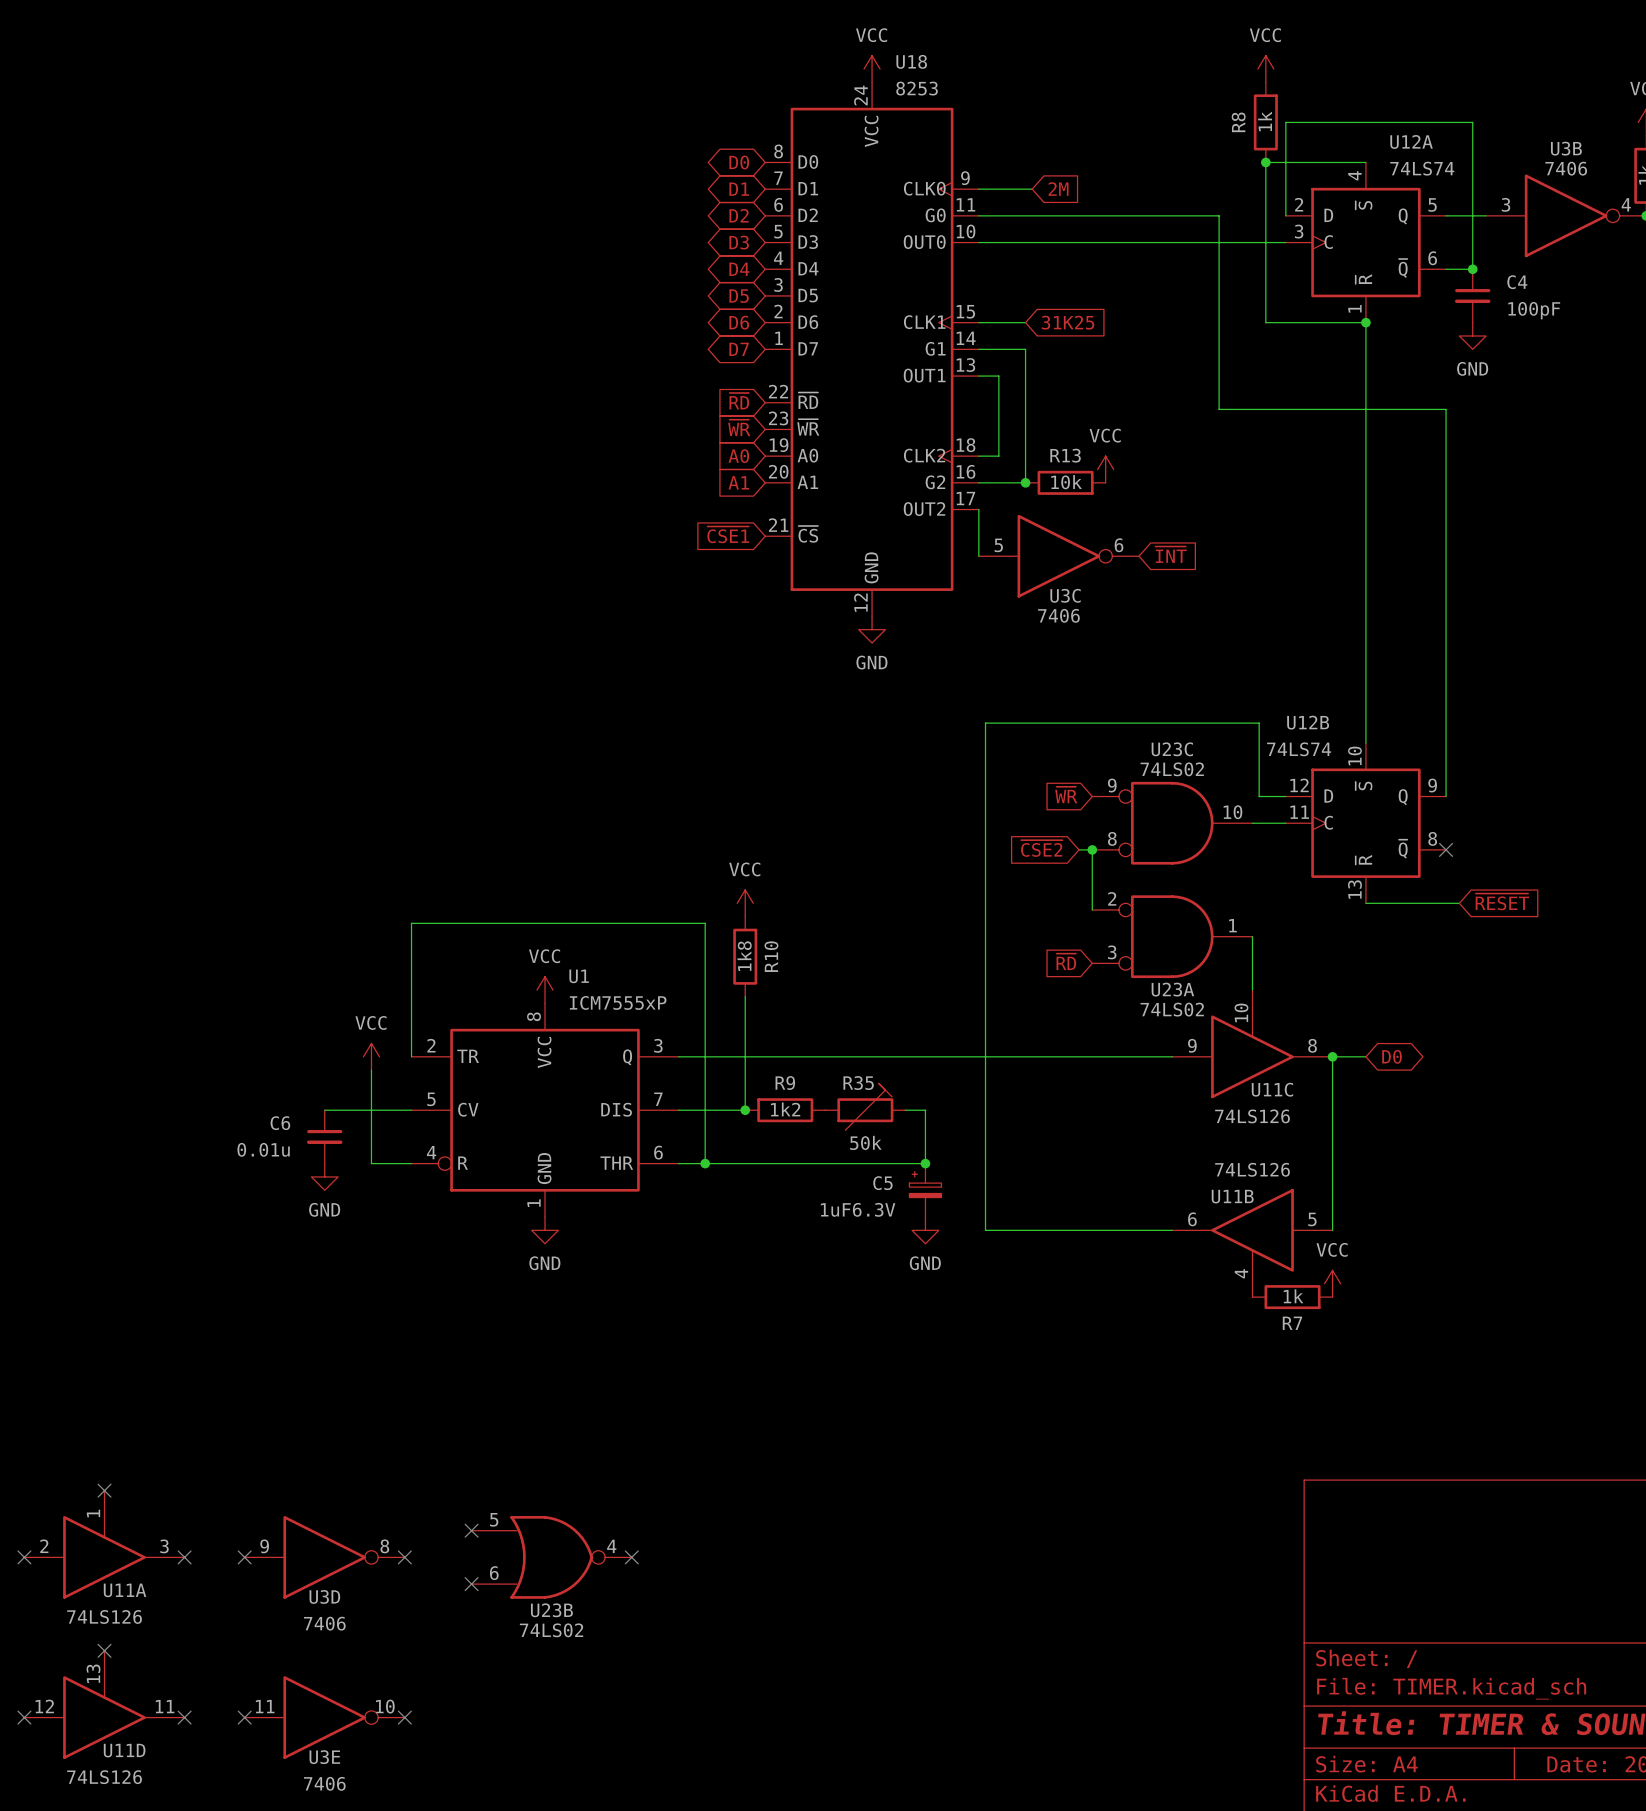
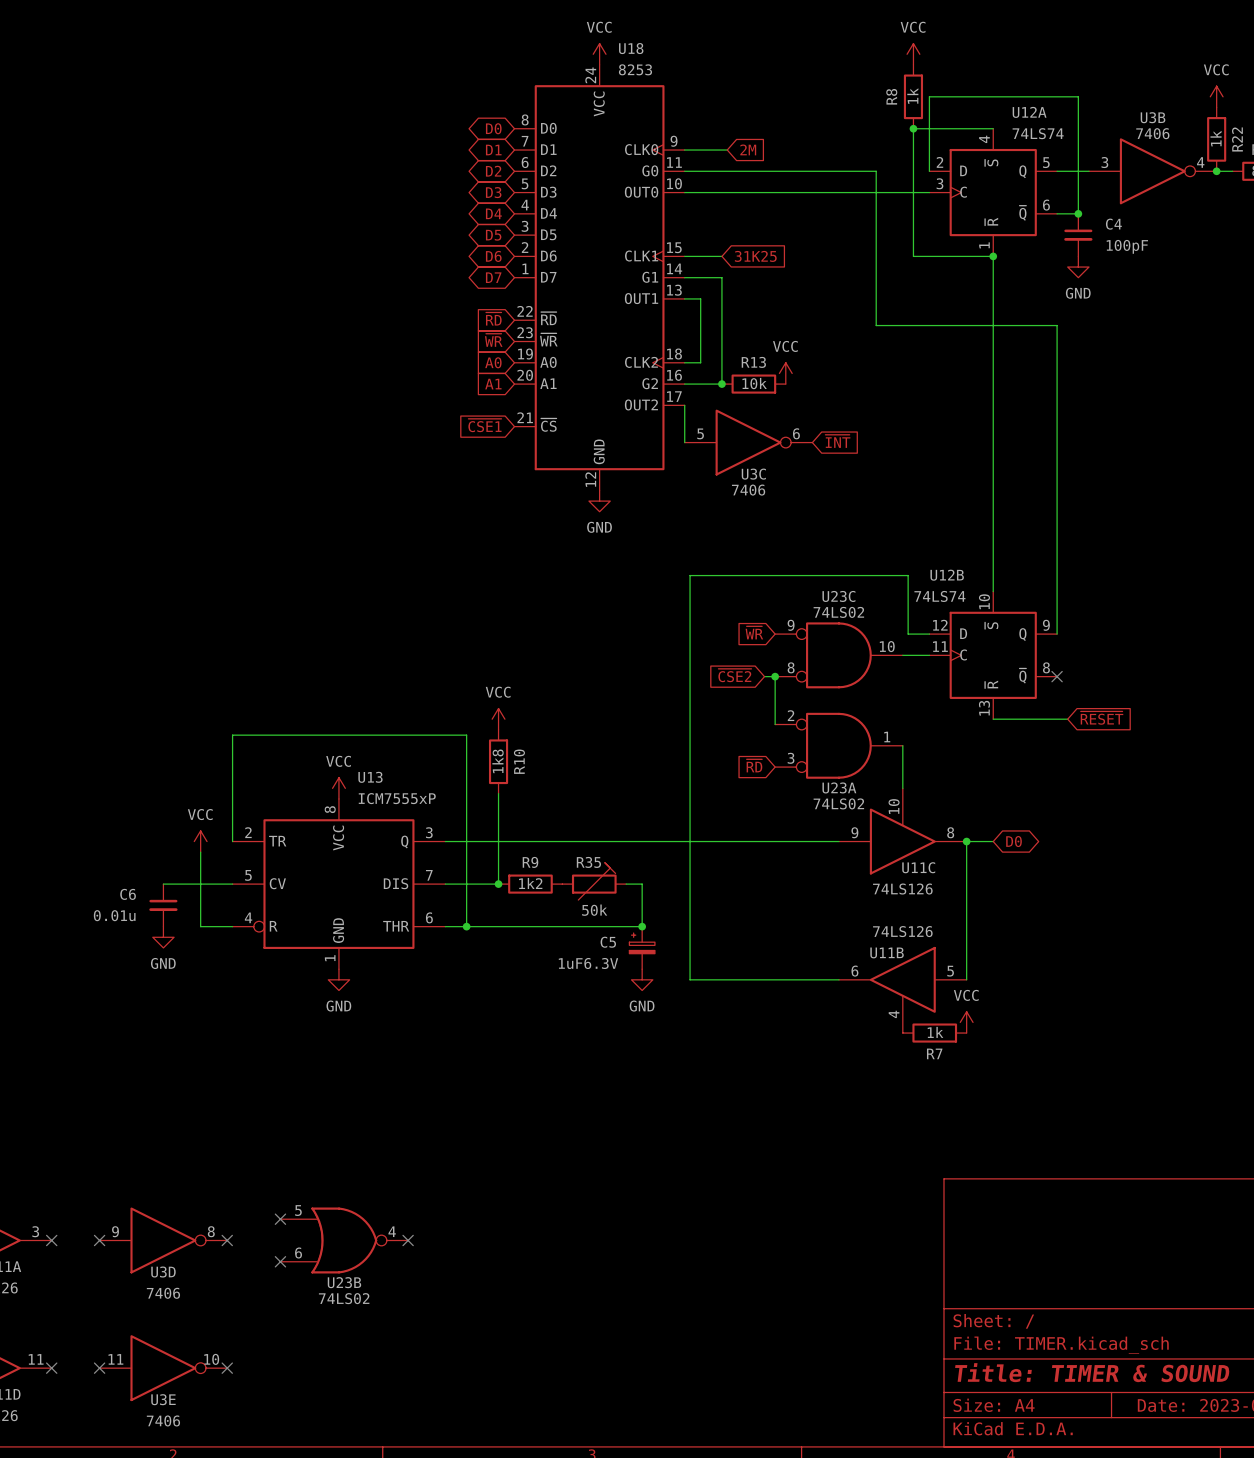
U1 name: U1 (579, 976) -> U13 (370, 777)

